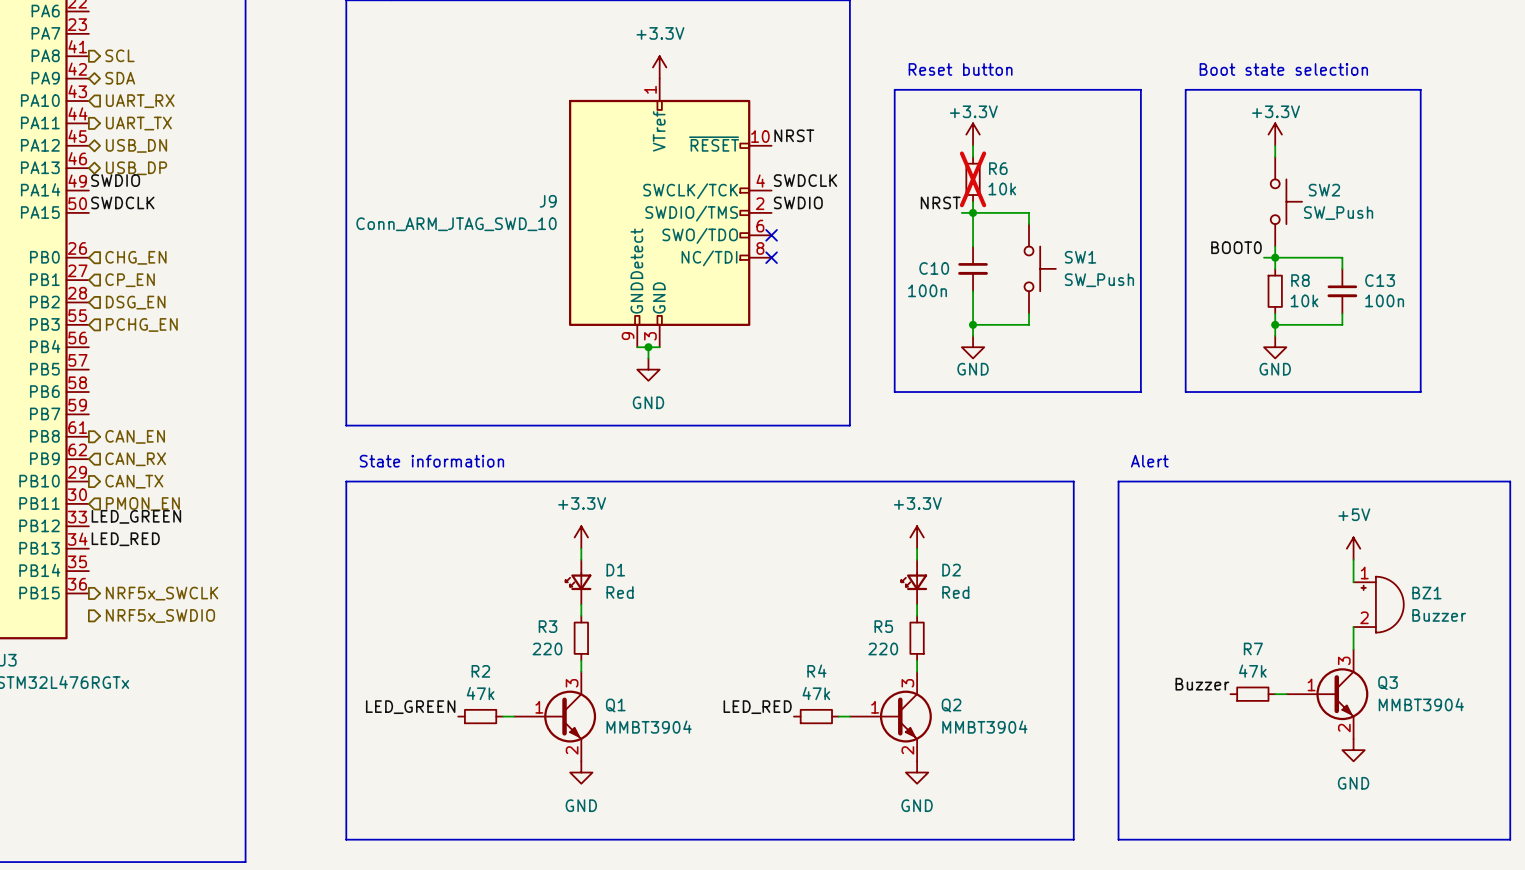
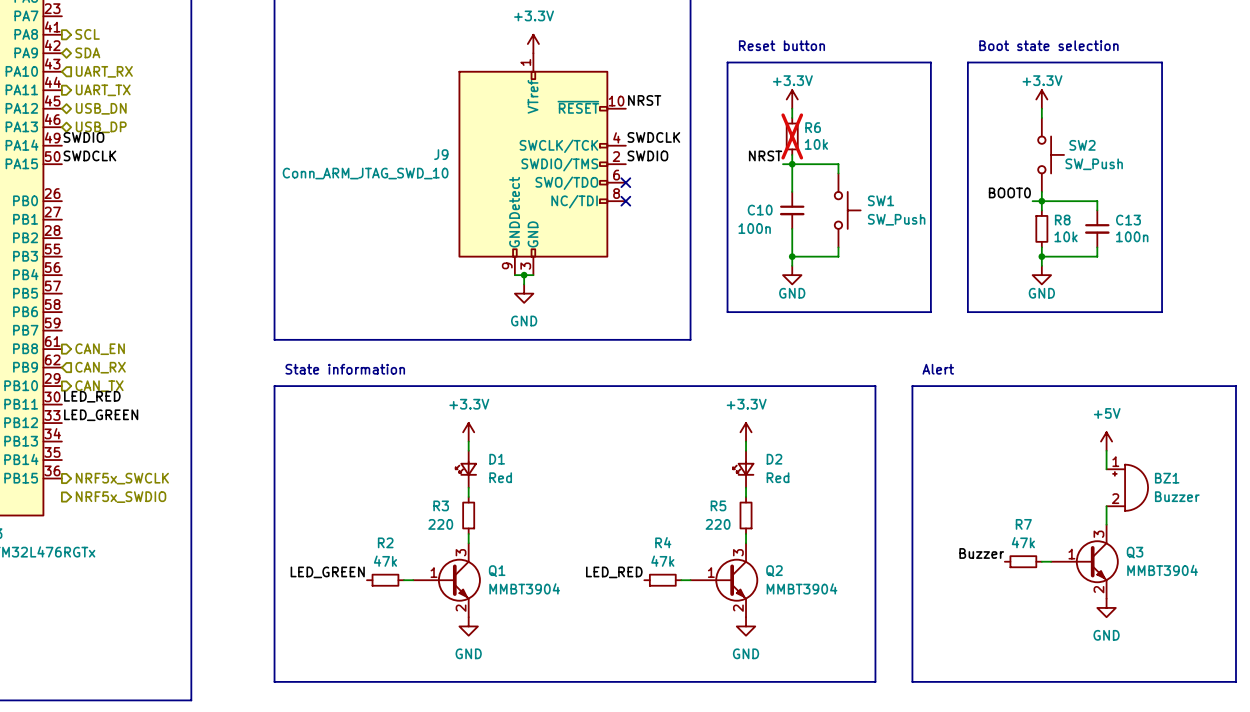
hierarchical label: CHG_EN (135, 257) -> none
hierarchical label: CP_EN (130, 280) -> none
hierarchical label: DSG_EN (135, 302) -> none
hierarchical label: PCHG_EN (141, 324) -> none
hierarchical label: PMON_EN (142, 504) -> none
label position: LED_RED (125, 539) -> LED_RED (92, 396)

